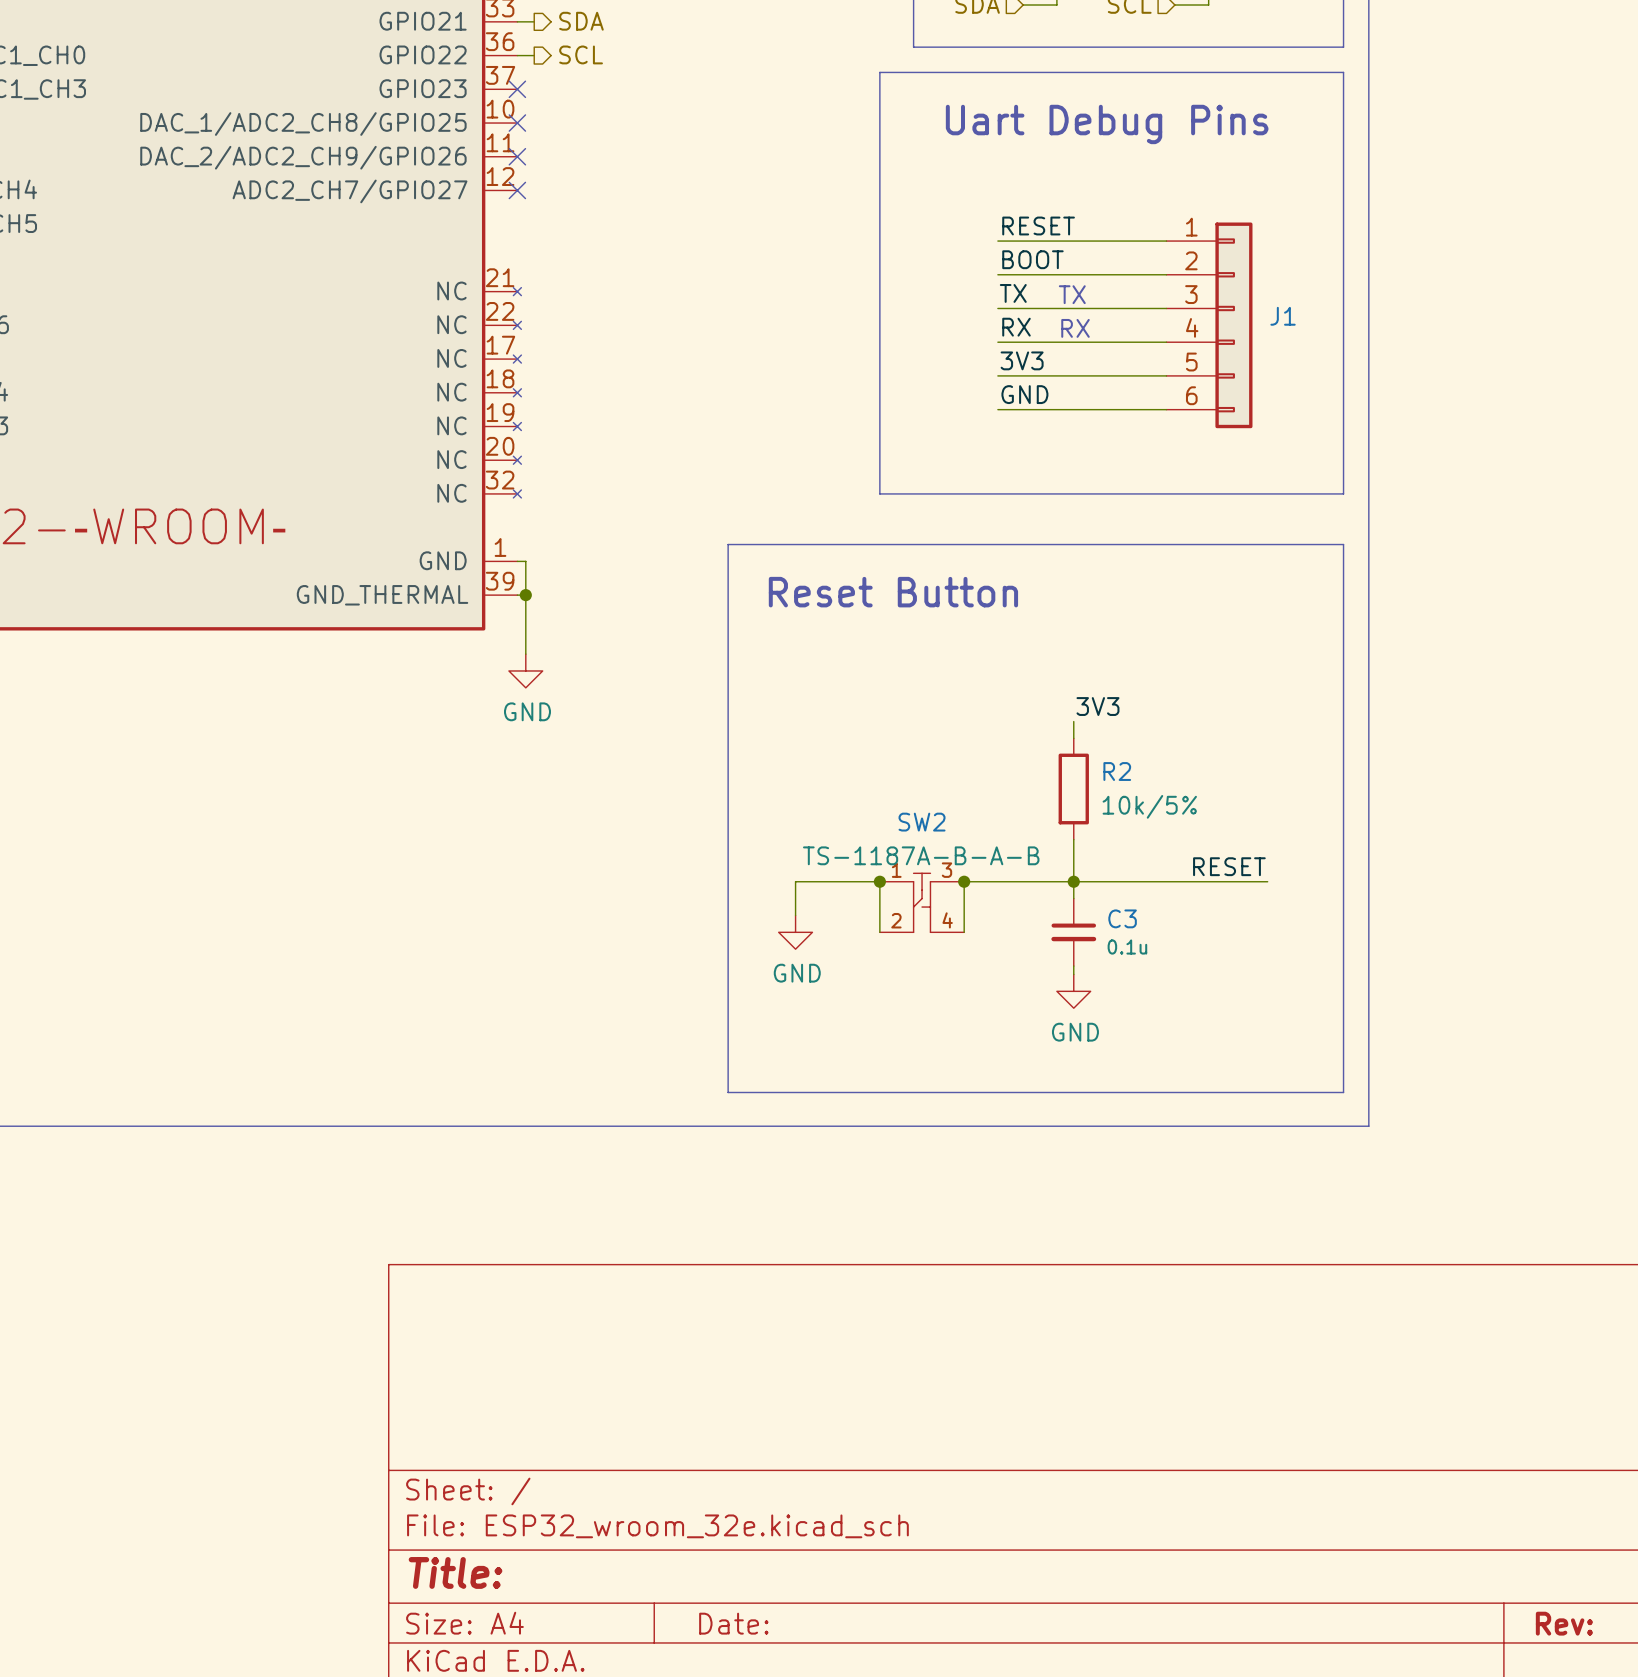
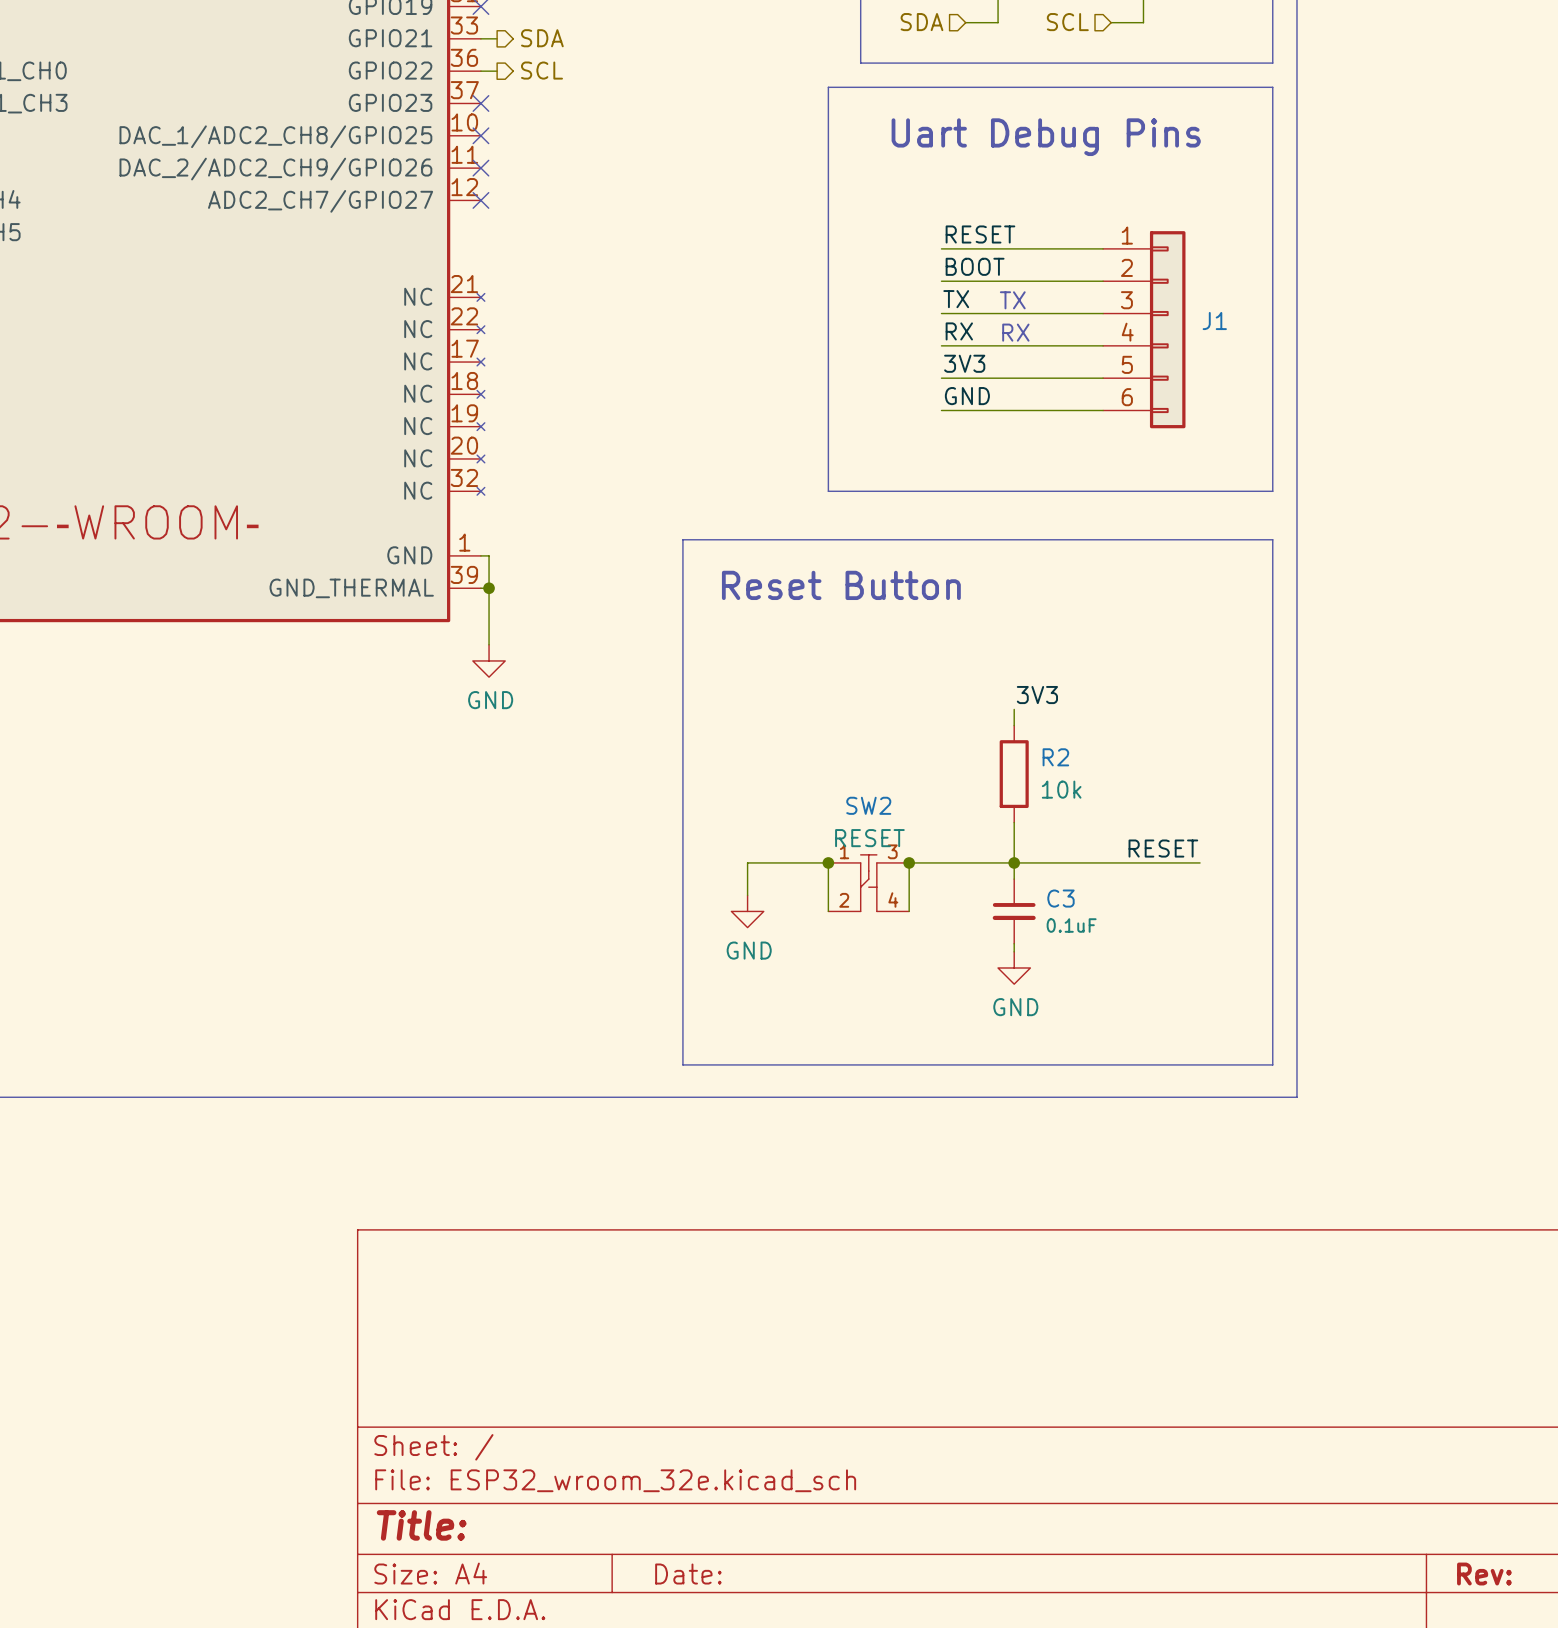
R2 value: 10k/5% (1149, 806) -> 10k (1061, 789)
SW2 value: TS-1187A-B-A-B (921, 855) -> RESET (869, 838)
C3 value: 0.1u (1127, 947) -> 0.1uF (1071, 925)

